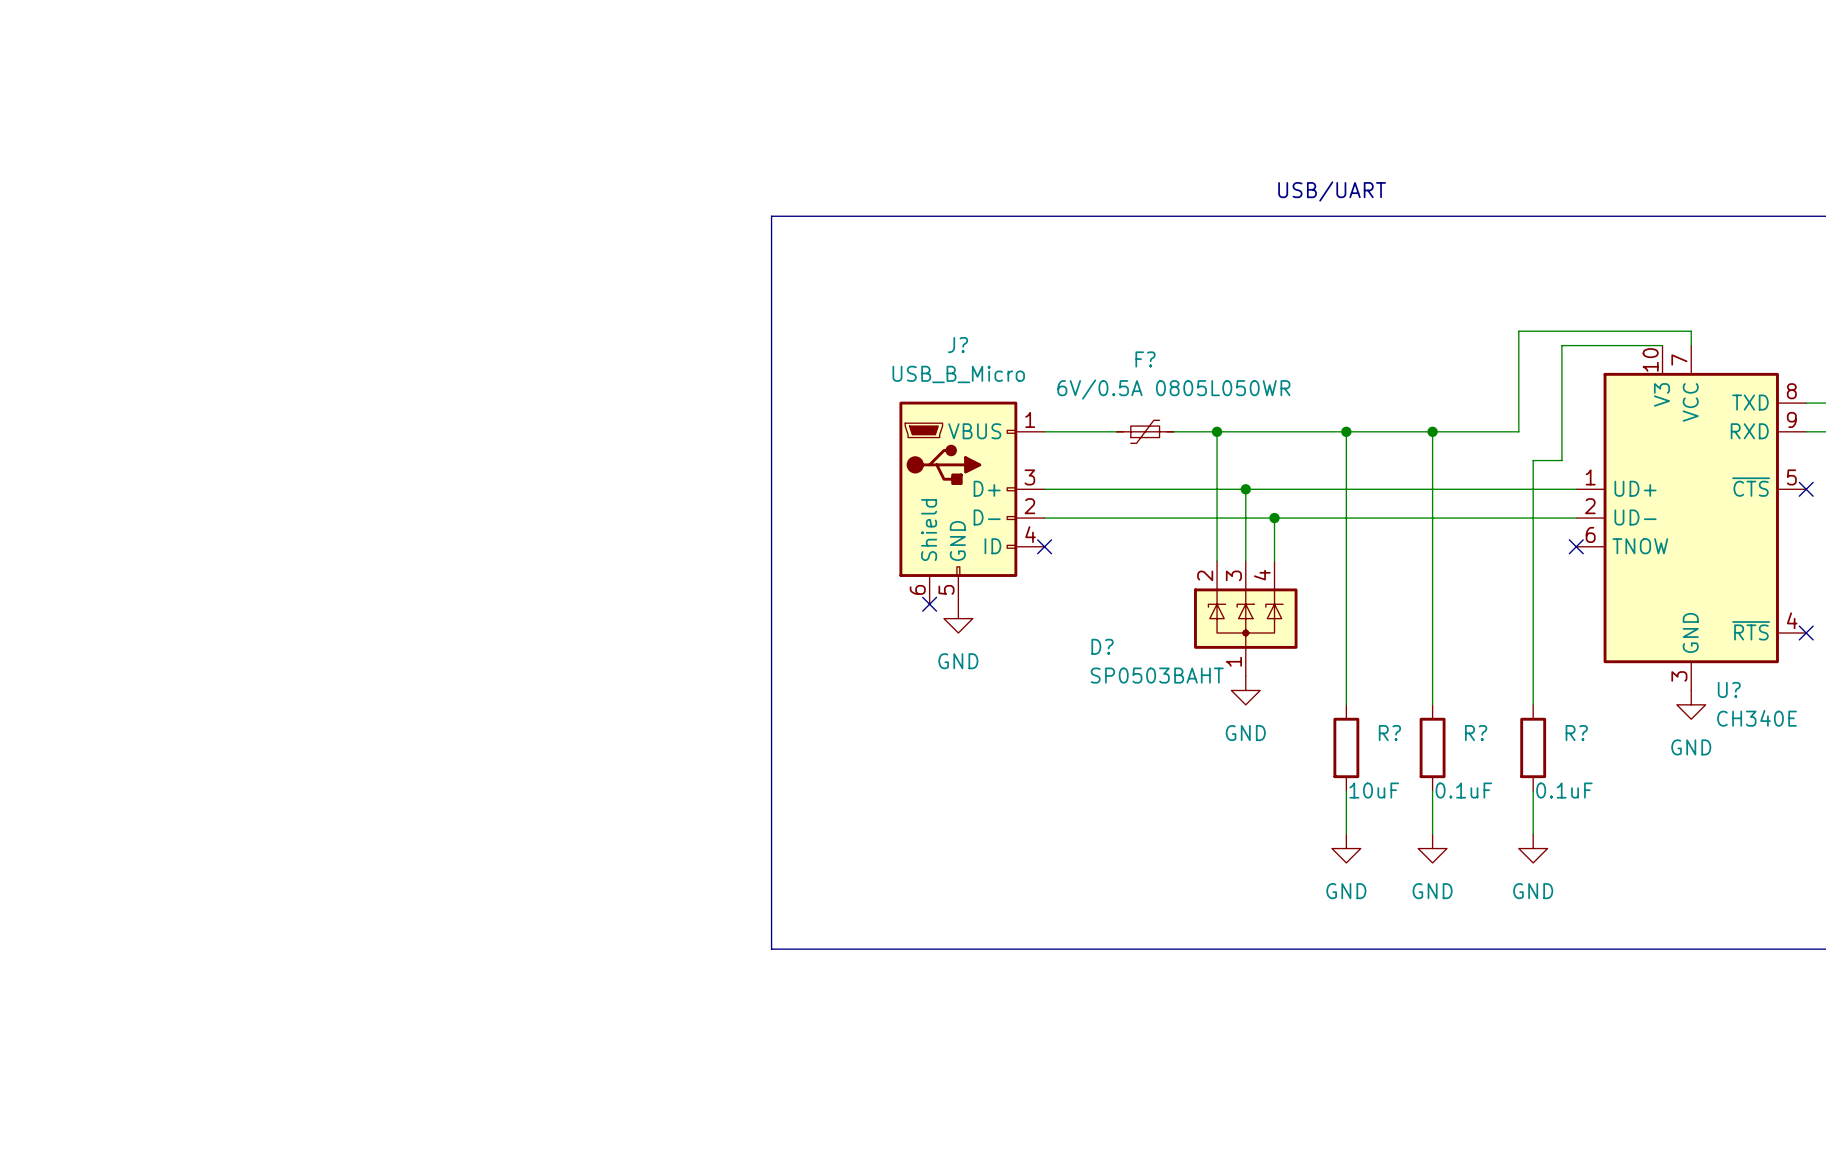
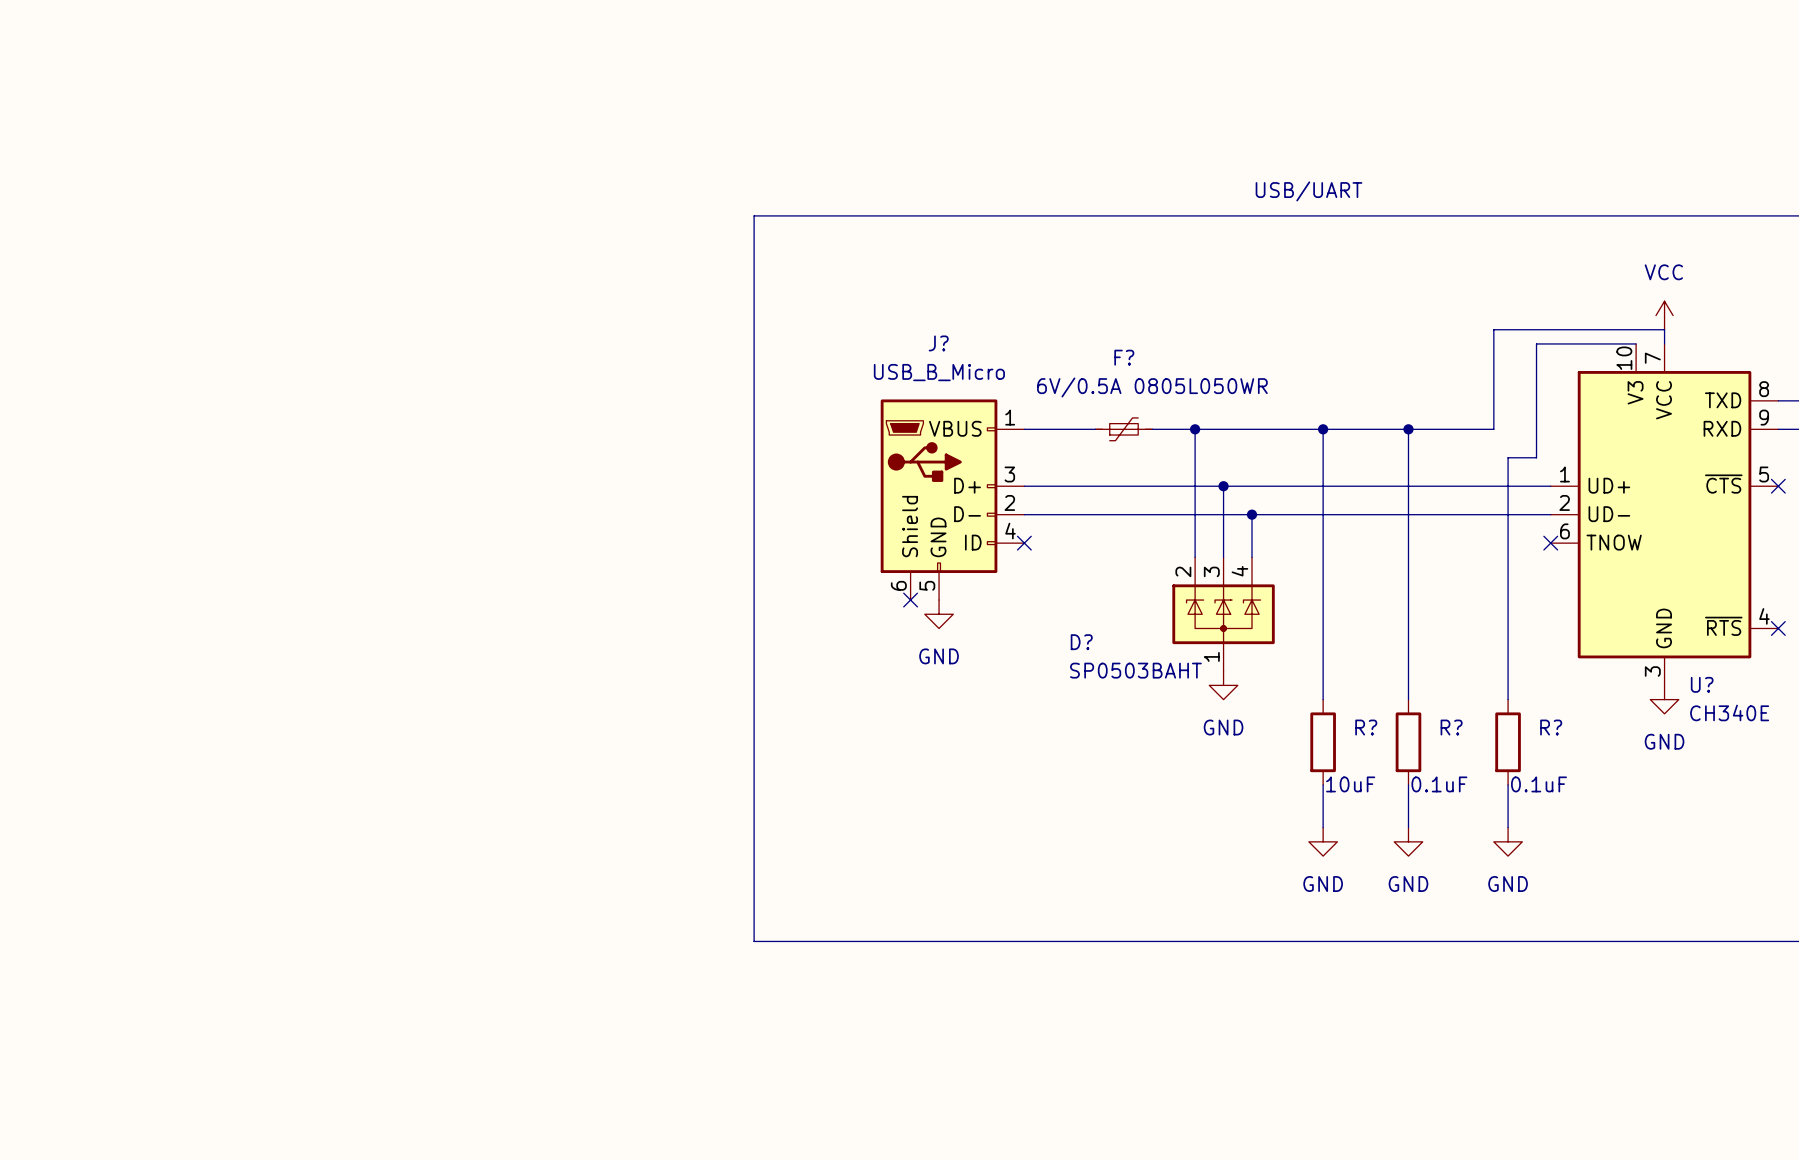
power symbol: none -> VCC (1664, 315)

